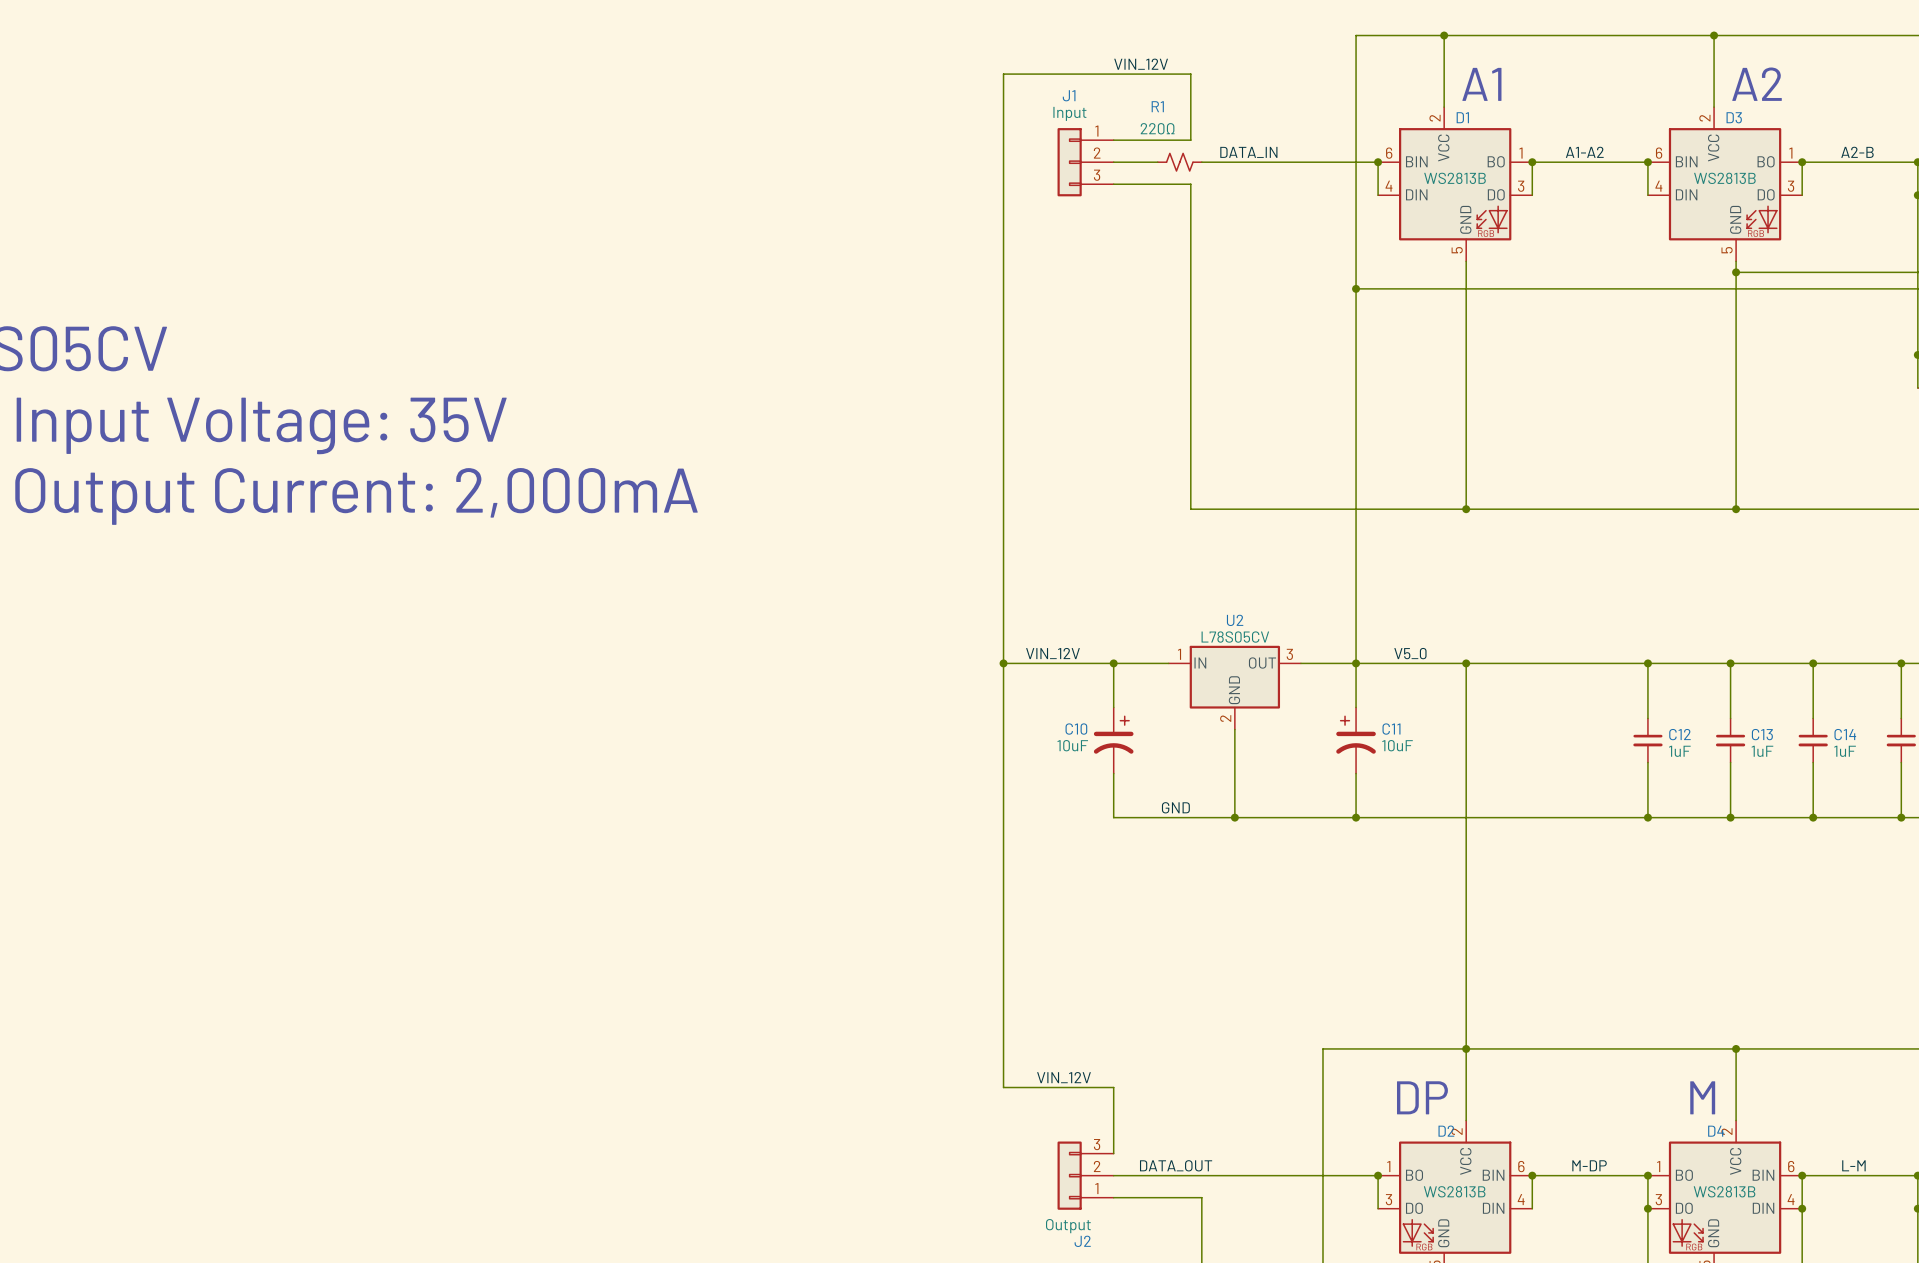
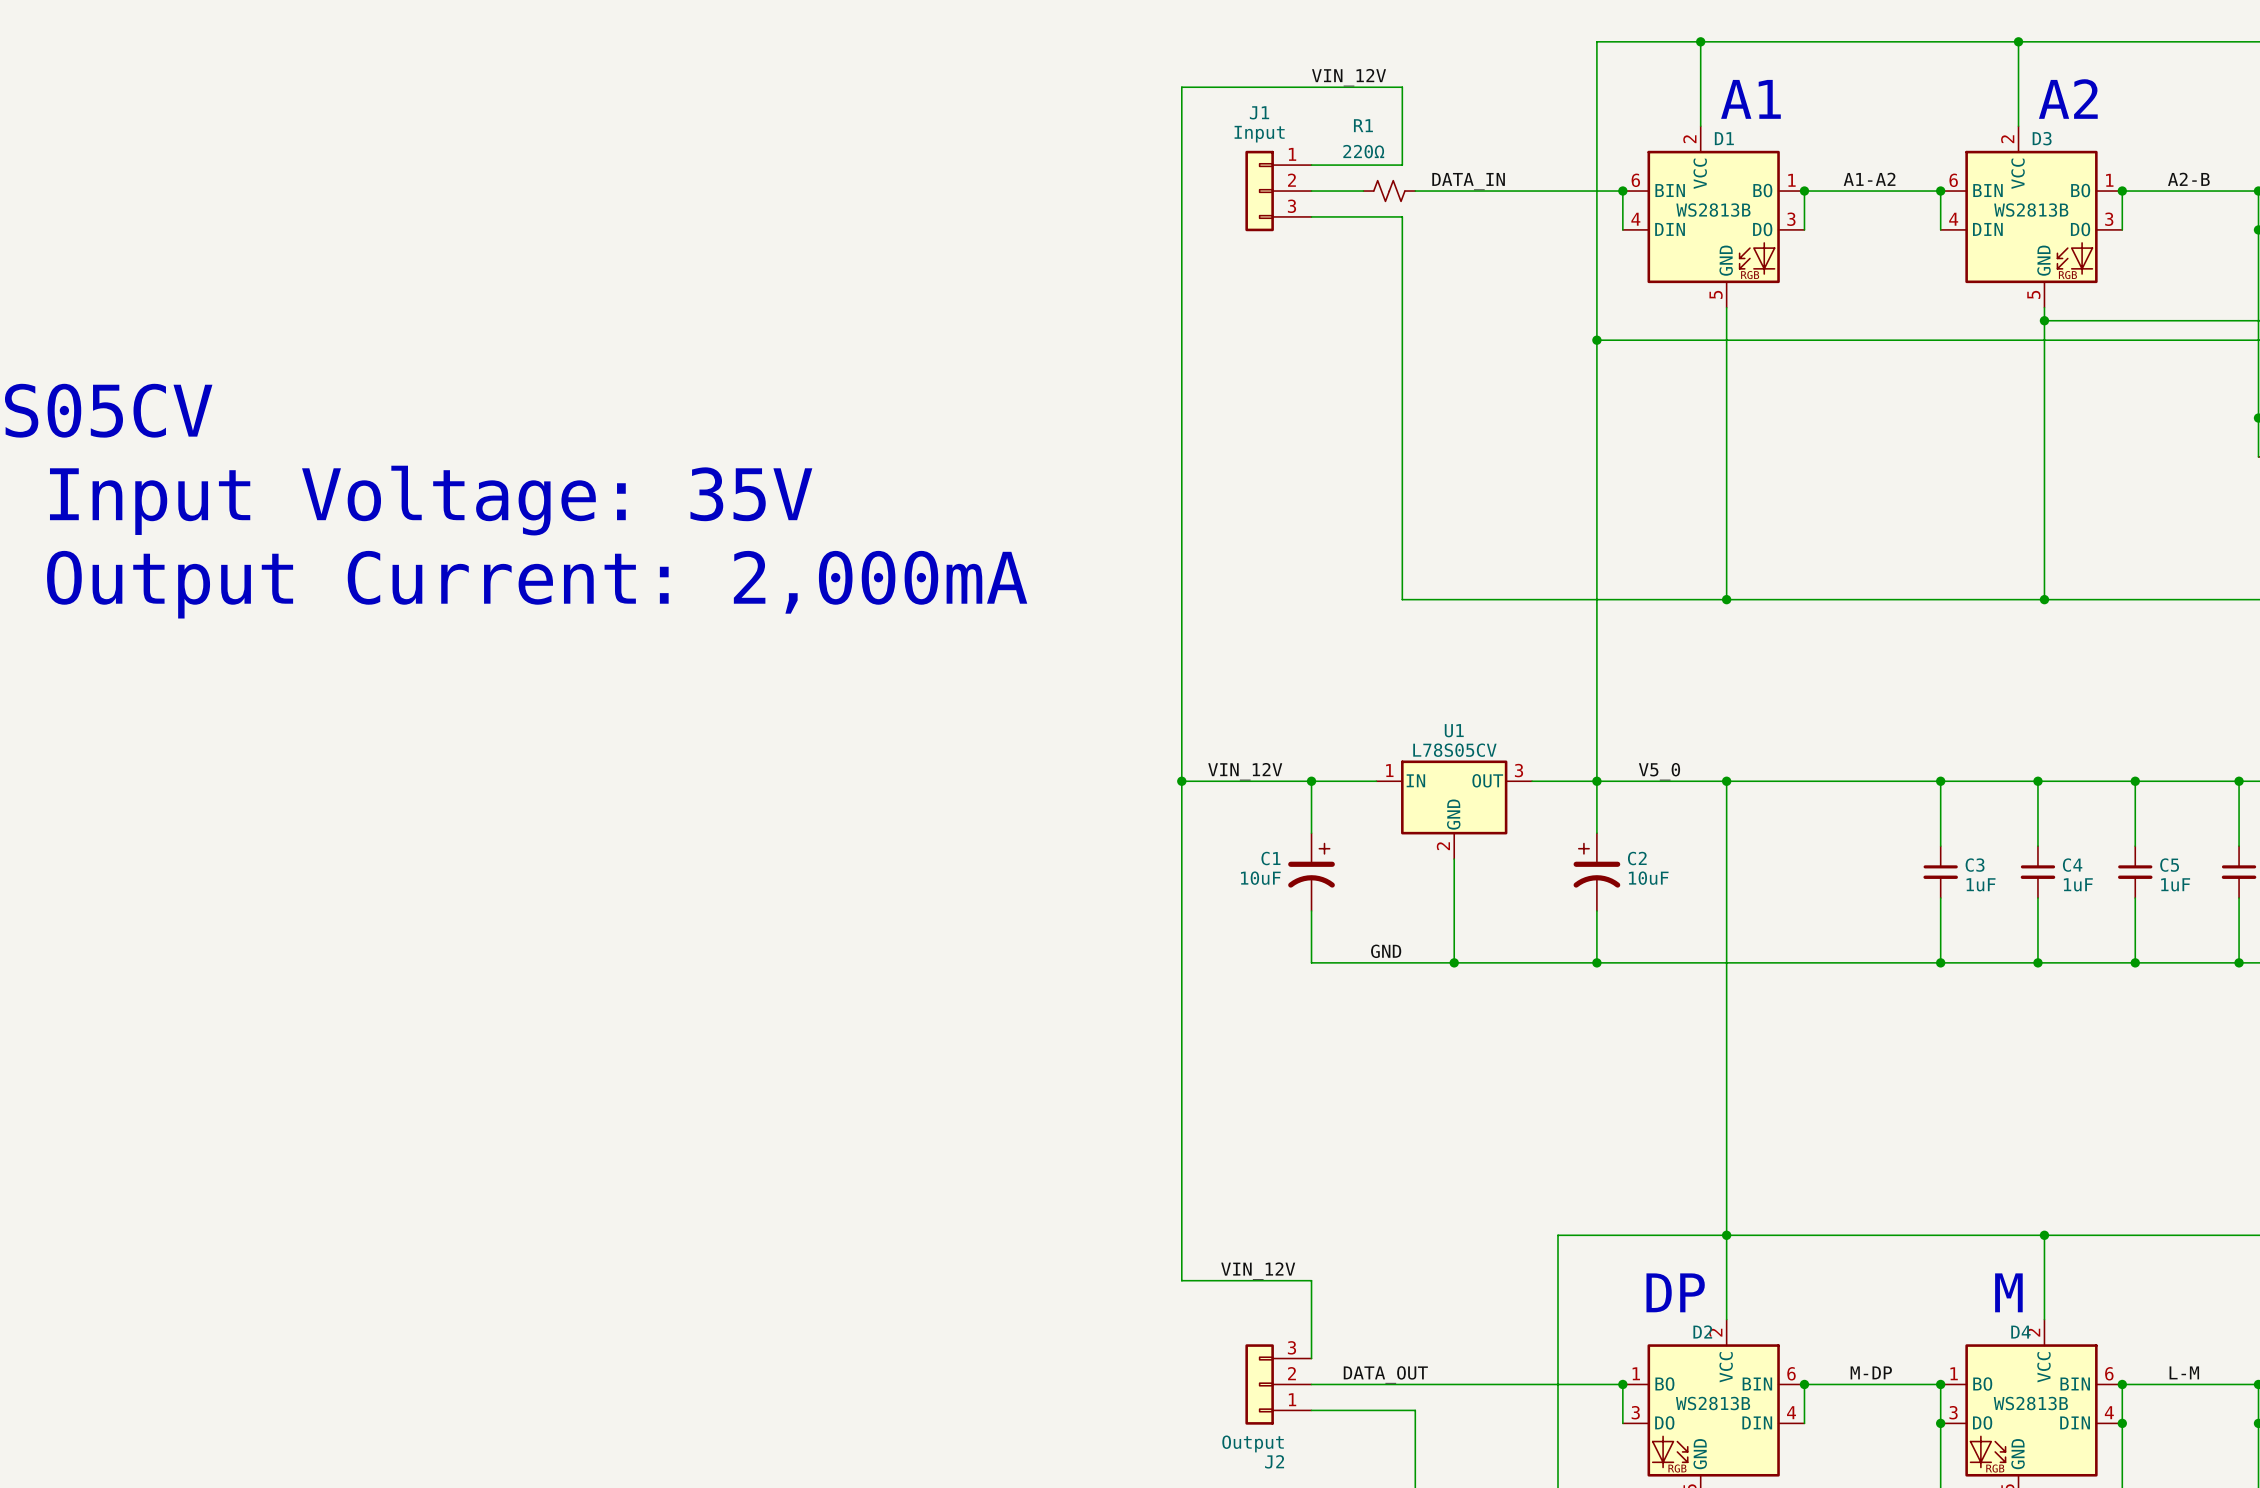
U2 name: U2 (1235, 620) -> U1 (1454, 730)
C10 name: C10 (1076, 729) -> C1 (1270, 858)
C11 name: C11 (1391, 729) -> C2 (1637, 858)
C12 name: C12 (1679, 734) -> C3 (1975, 865)
C13 name: C13 (1762, 734) -> C4 (2072, 865)
C14 name: C14 (1845, 734) -> C5 (2169, 865)

